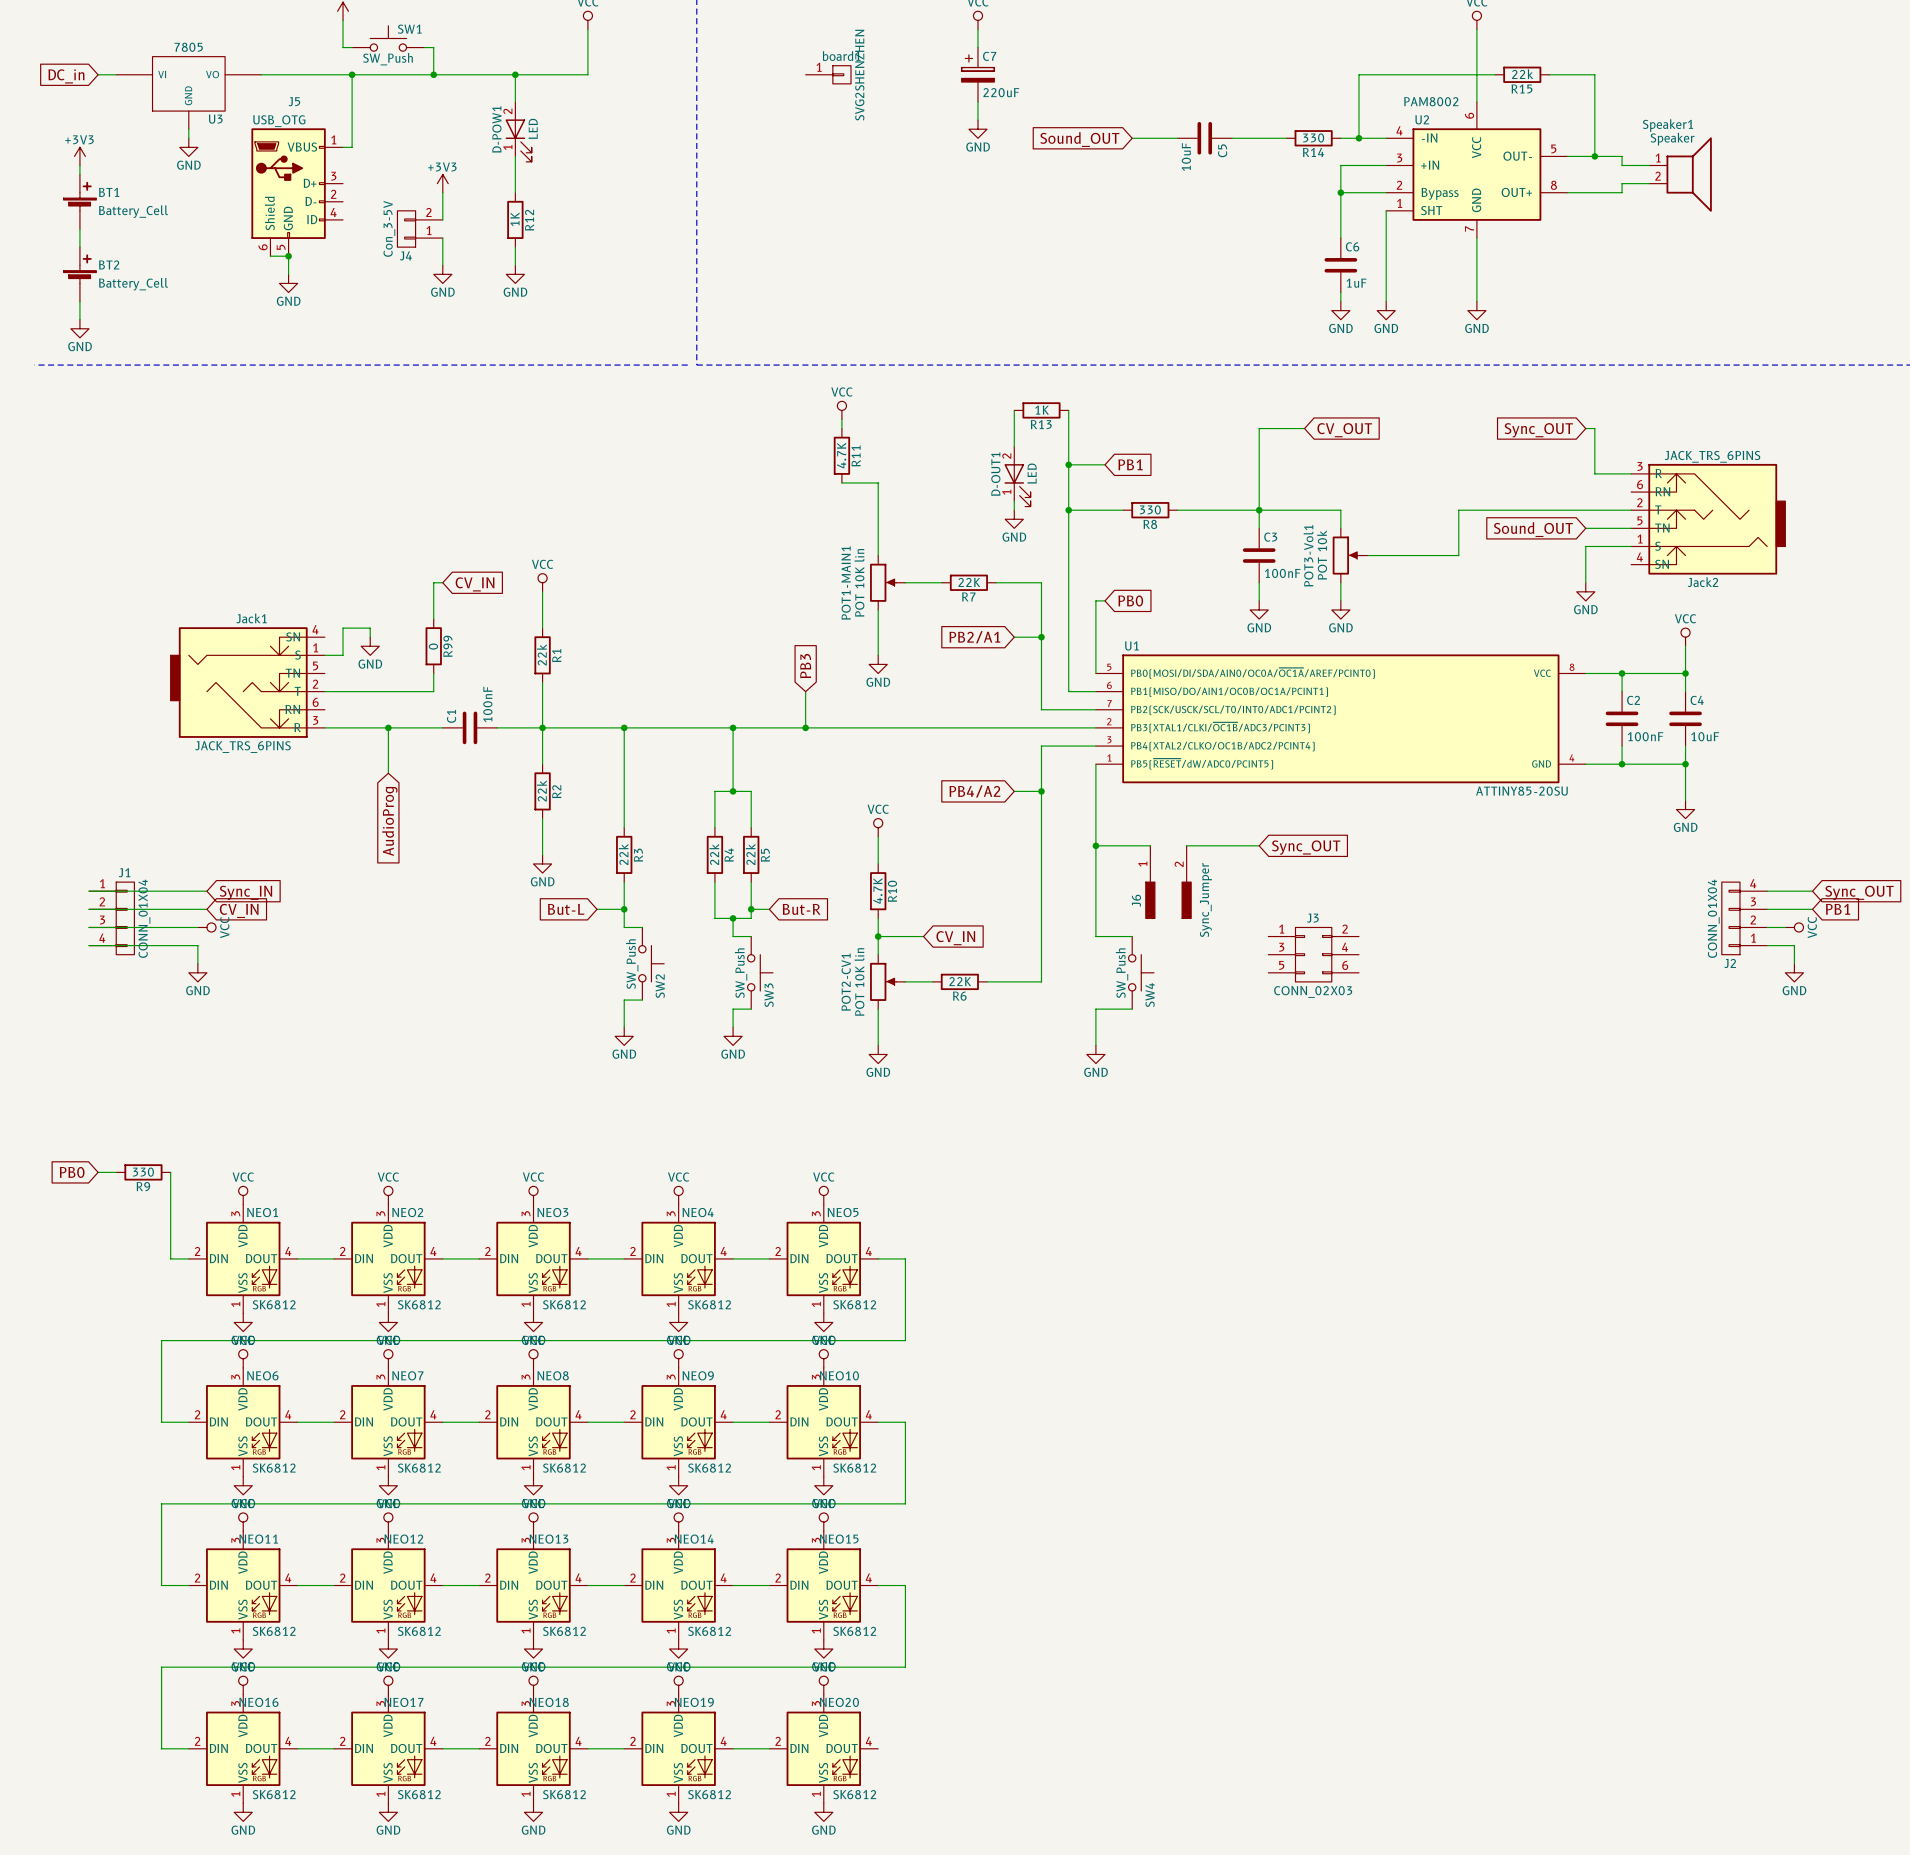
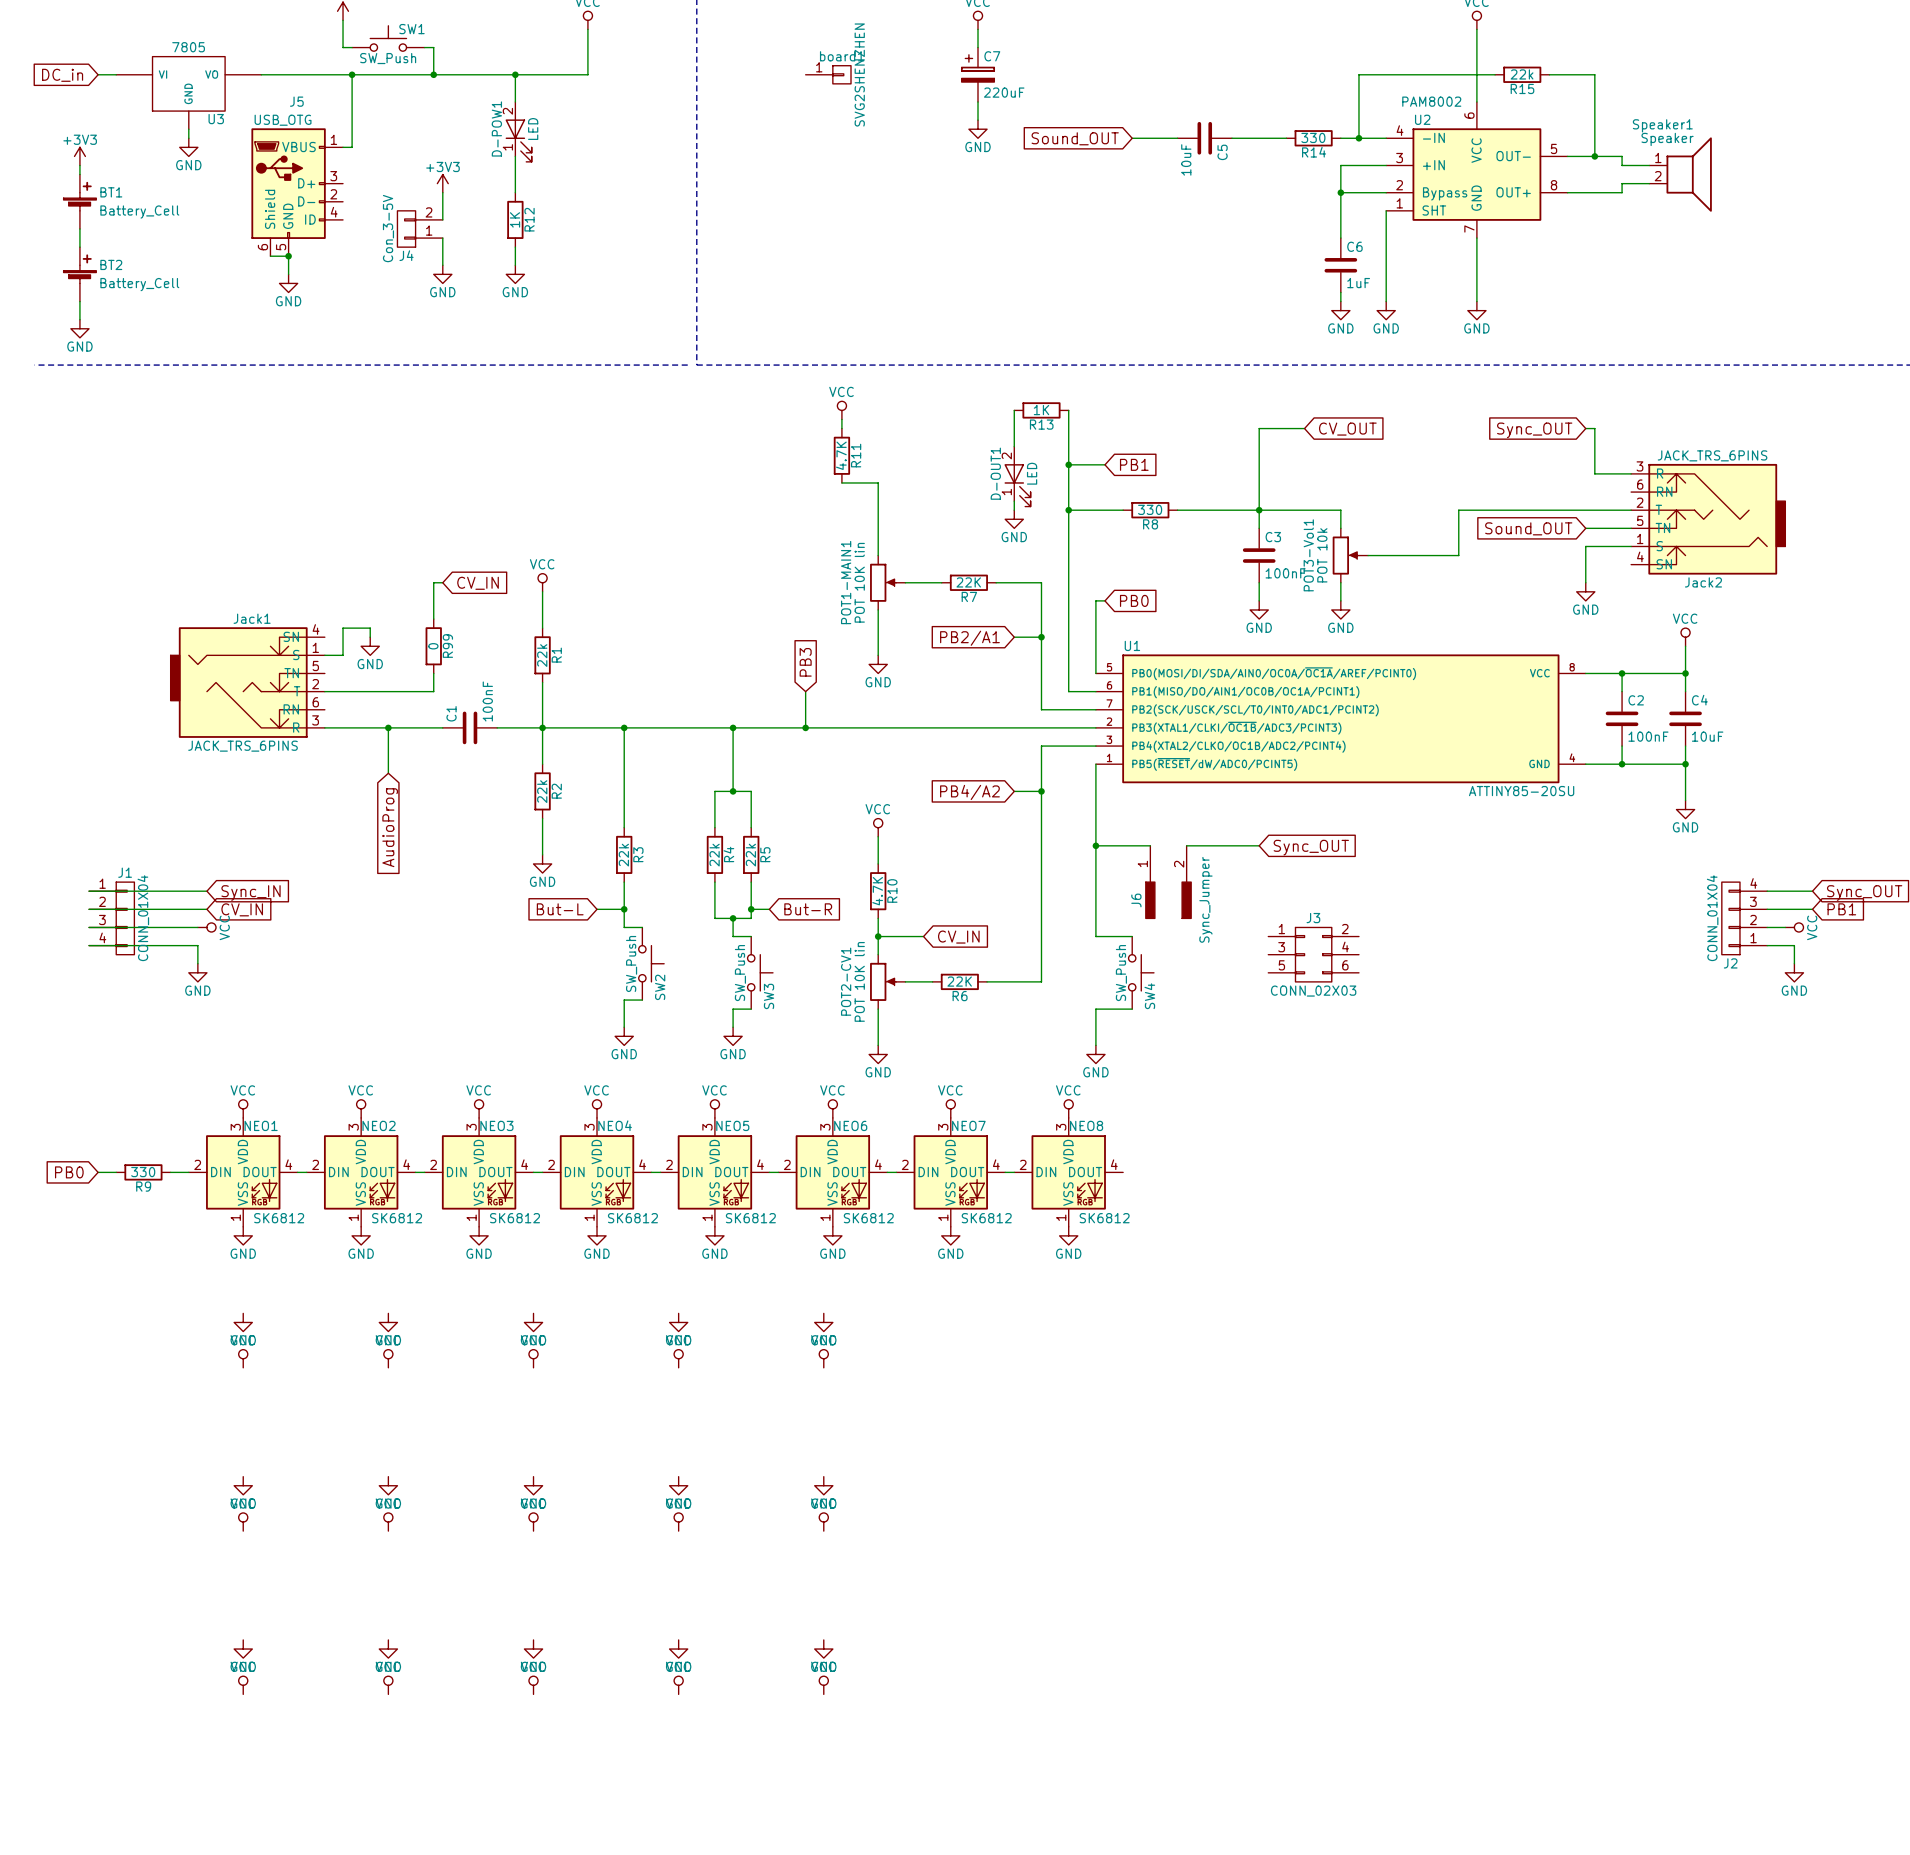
power symbol: none -> VCC (243, 1108)
power symbol: none -> VCC (361, 1108)
power symbol: none -> VCC (479, 1108)
power symbol: none -> VCC (597, 1108)
power symbol: none -> VCC (714, 1108)
power symbol: none -> VCC (832, 1108)
power symbol: none -> VCC (950, 1108)
power symbol: none -> VCC (1068, 1108)
wire: (170, 1172) (170, 1258) (188, 1258) -> (170, 1172) (188, 1172)
wire: none -> (297, 1172) (306, 1172)
wire: none -> (415, 1172) (424, 1172)
wire: none -> (533, 1172) (542, 1172)
wire: none -> (651, 1172) (660, 1172)
wire: none -> (769, 1172) (778, 1172)
wire: none -> (887, 1172) (896, 1172)
wire: none -> (1005, 1172) (1014, 1172)
power symbol: VCC (243, 1195) -> none
power symbol: VCC (388, 1195) -> none
power symbol: VCC (533, 1195) -> none
power symbol: VCC (678, 1195) -> none
power symbol: VCC (823, 1195) -> none
power symbol: none -> GND (243, 1235)
power symbol: none -> GND (361, 1235)
power symbol: none -> GND (479, 1235)
power symbol: none -> GND (597, 1235)
power symbol: none -> GND (714, 1235)
power symbol: none -> GND (832, 1235)
power symbol: none -> GND (950, 1235)
power symbol: none -> GND (1068, 1235)
NEO1 position: (243, 1258) -> (243, 1172)
wire: (297, 1258) (333, 1258) -> none
NEO2 position: (388, 1258) -> (361, 1172)
wire: (442, 1258) (479, 1258) -> none
NEO3 position: (533, 1258) -> (479, 1172)
wire: (587, 1258) (624, 1258) -> none
NEO4 position: (678, 1258) -> (597, 1172)
wire: (733, 1258) (769, 1258) -> none
NEO5 position: (823, 1258) -> (714, 1172)
wire: (878, 1258) (905, 1258) (905, 1340) (161, 1340) (161, 1422) (188, 1422) -> none
NEO6 position: (243, 1422) -> (832, 1172)
wire: (297, 1422) (333, 1422) -> none
NEO7 position: (388, 1422) -> (950, 1172)
wire: (442, 1422) (479, 1422) -> none
NEO8 position: (533, 1422) -> (1068, 1172)
wire: (587, 1422) (624, 1422) -> none
NEO9: SK6812 (678, 1422) -> none
wire: (733, 1422) (769, 1422) -> none
NEO10: SK6812 (823, 1422) -> none
wire: (878, 1422) (905, 1422) (905, 1503) (161, 1503) (161, 1585) (188, 1585) -> none
NEO11: SK6812 (243, 1585) -> none
wire: (297, 1585) (333, 1585) -> none
NEO12: SK6812 (388, 1585) -> none
wire: (442, 1585) (479, 1585) -> none
NEO13: SK6812 (533, 1585) -> none
wire: (587, 1585) (624, 1585) -> none
NEO14: SK6812 (678, 1585) -> none
wire: (733, 1585) (769, 1585) -> none
NEO15: SK6812 (823, 1585) -> none
wire: (878, 1585) (905, 1585) (905, 1667) (161, 1667) (161, 1748) (188, 1748) -> none
NEO16: SK6812 (243, 1748) -> none
wire: (297, 1748) (333, 1748) -> none
NEO17: SK6812 (388, 1748) -> none
wire: (442, 1748) (479, 1748) -> none
NEO18: SK6812 (533, 1748) -> none
wire: (587, 1748) (624, 1748) -> none
NEO19: SK6812 (678, 1748) -> none
wire: (733, 1748) (769, 1748) -> none
NEO20: SK6812 (823, 1748) -> none
power symbol: GND (243, 1812) -> none
power symbol: GND (388, 1812) -> none
power symbol: GND (533, 1812) -> none
power symbol: GND (678, 1812) -> none
power symbol: GND (823, 1812) -> none

